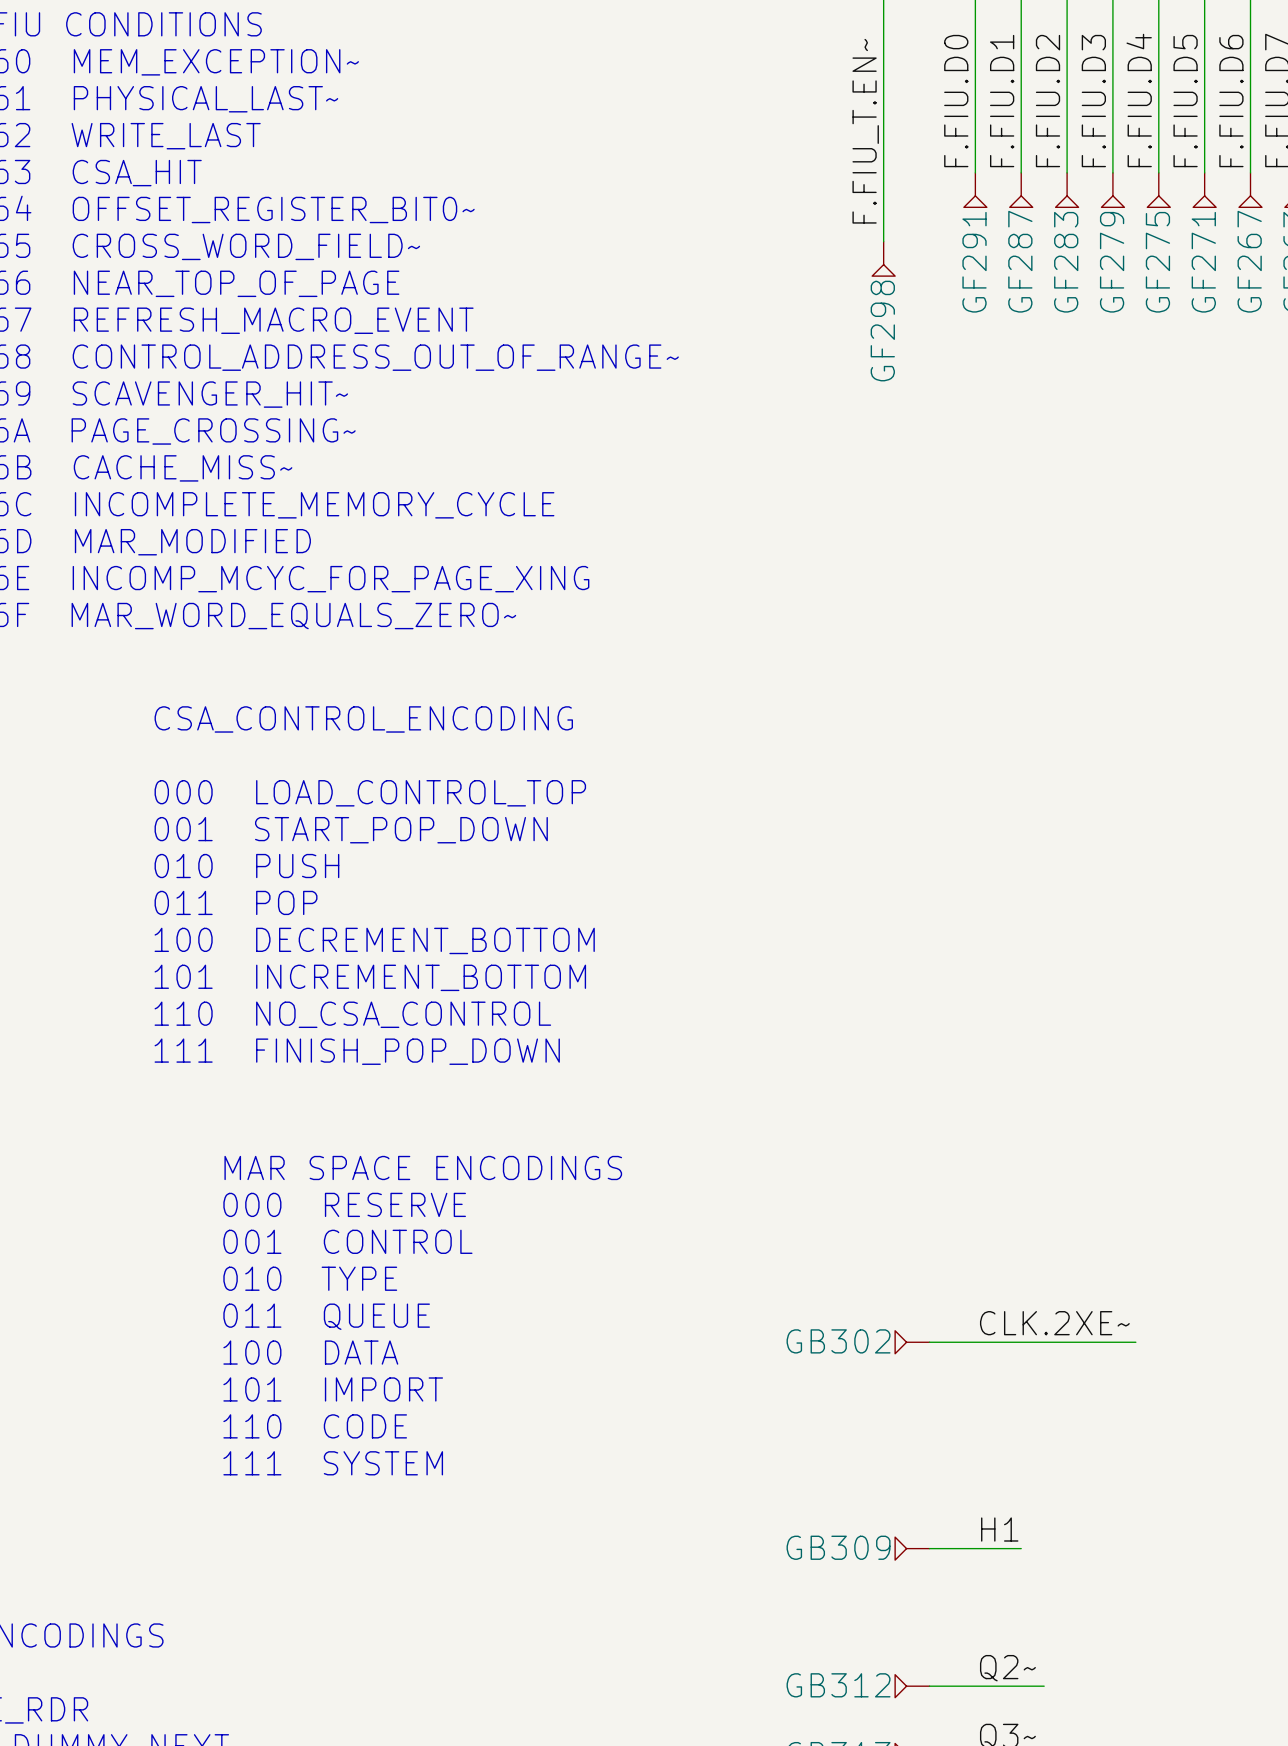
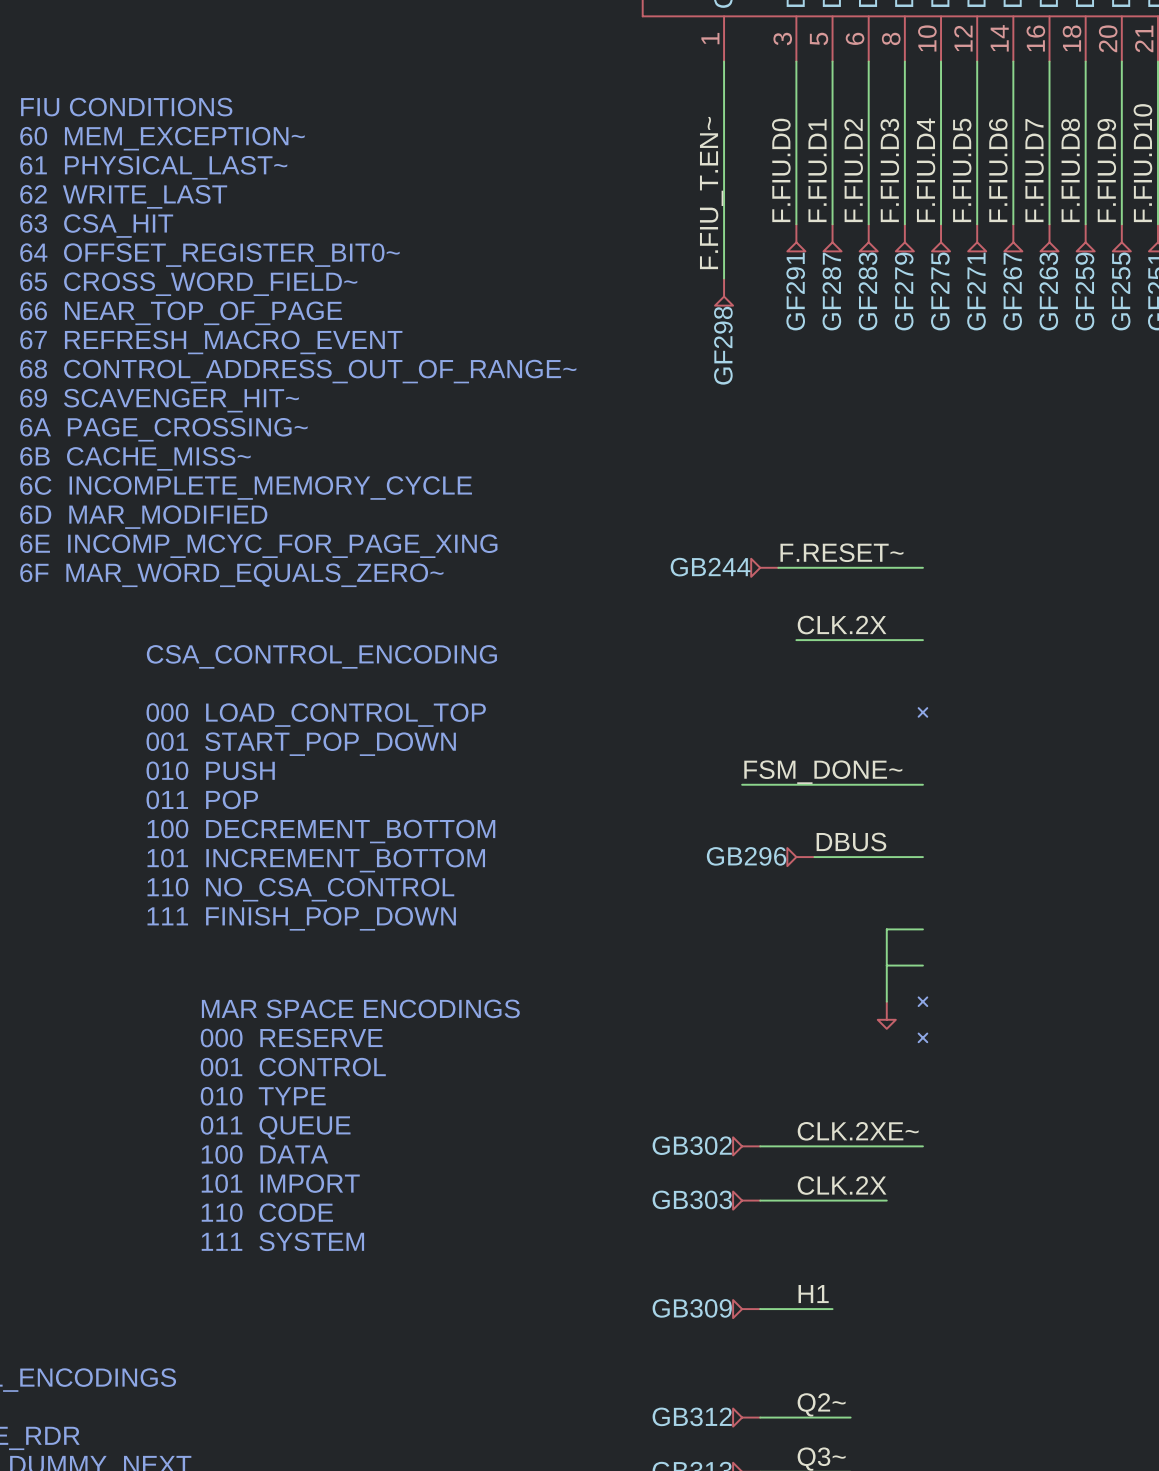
label: none -> F.RESET~ (841, 552)
GB244: none -> (764, 567)
wire: none -> (778, 567) (922, 567)
label: none -> CLK.2X (842, 625)
wire: none -> (796, 640) (922, 640)
no-connect mark: none -> (922, 712)
label: none -> FSM_DONE~ (823, 772)
wire: none -> (742, 784) (922, 784)
label: none -> DBUS (851, 842)
GB296: none -> (800, 857)
wire: none -> (814, 857) (922, 857)
wire: none -> (922, 929) (886, 929) (886, 1001)
wire: none -> (886, 965) (922, 965)
no-connect mark: none -> (922, 1001)
power symbol: none -> (886, 1015)
no-connect mark: none -> (922, 1037)
label: none -> CLK.2X (842, 1185)
GB303: none -> (746, 1200)
wire: none -> (760, 1200) (886, 1200)

